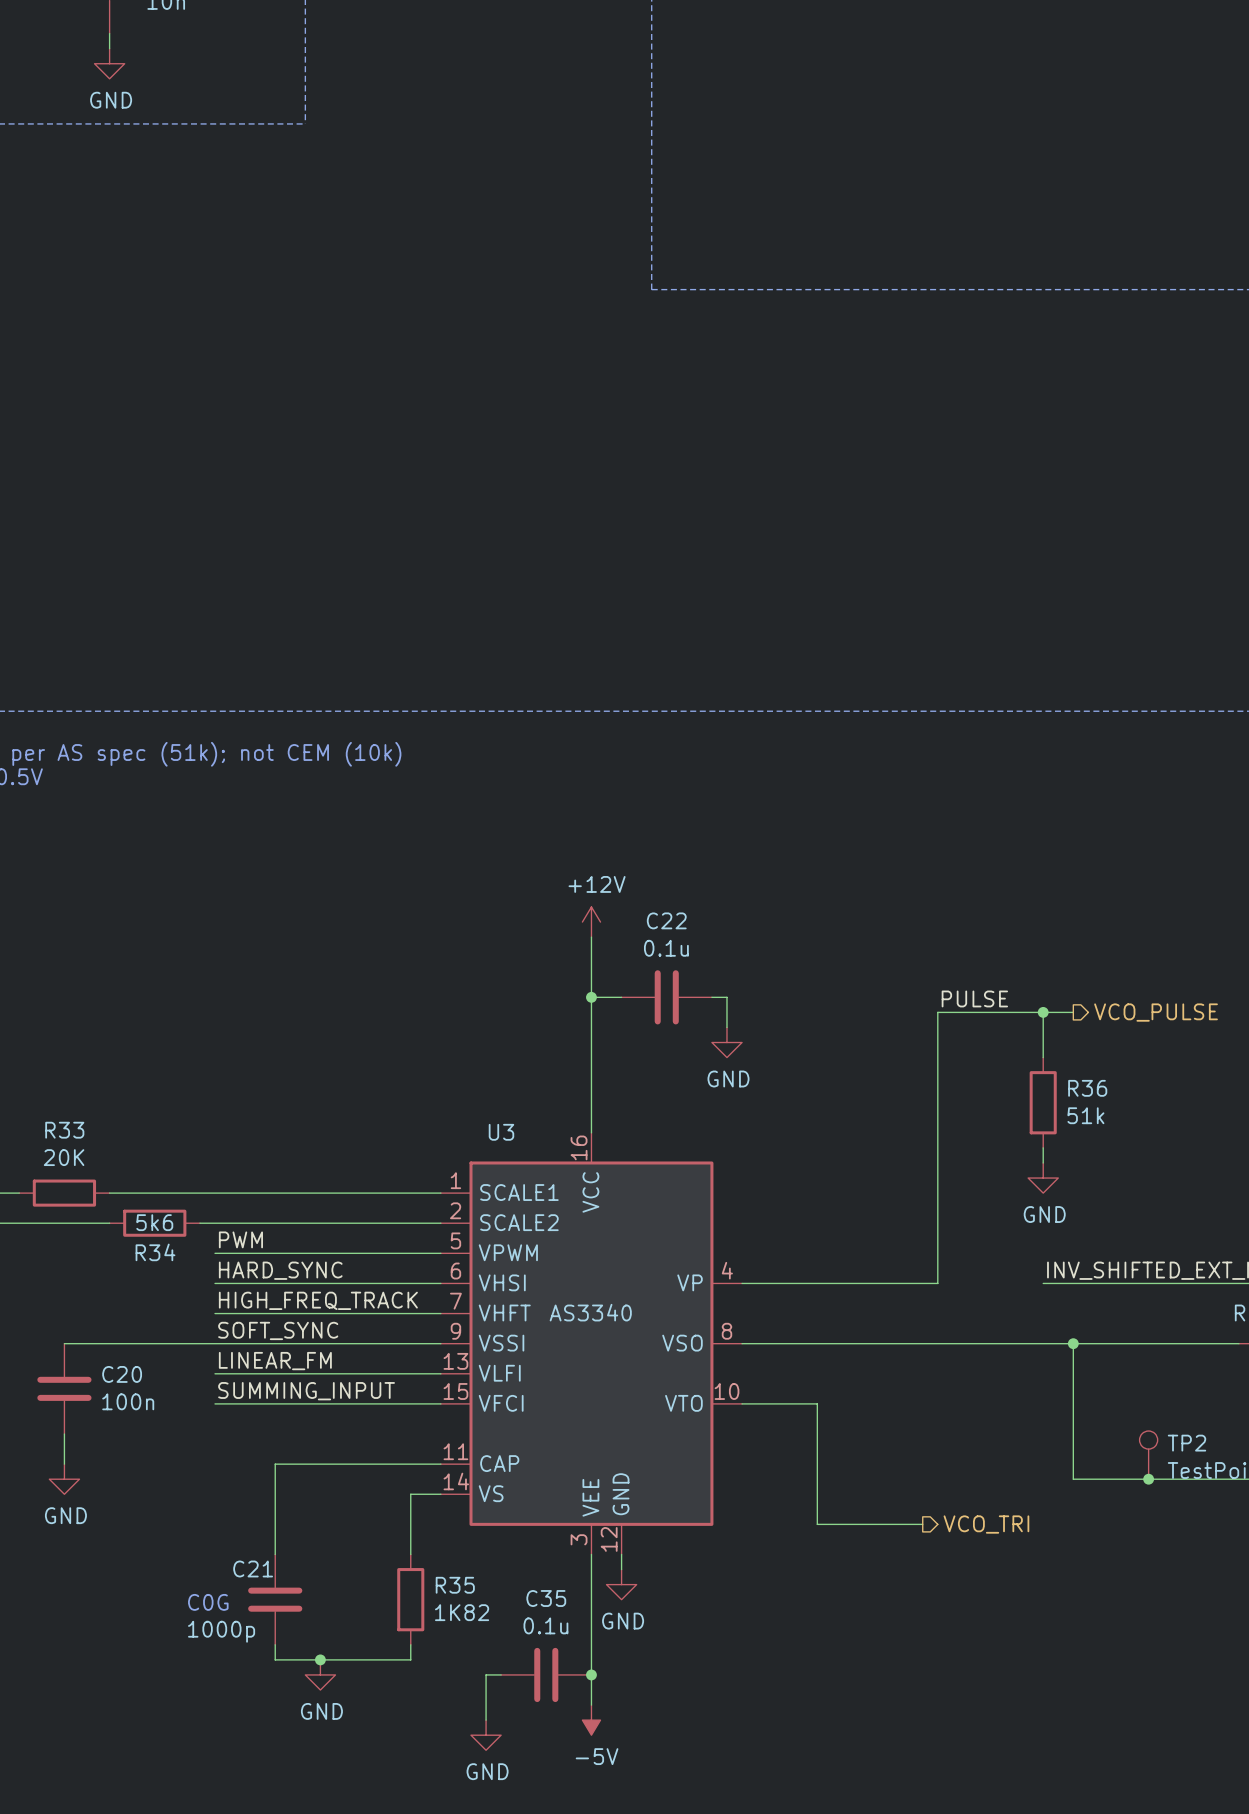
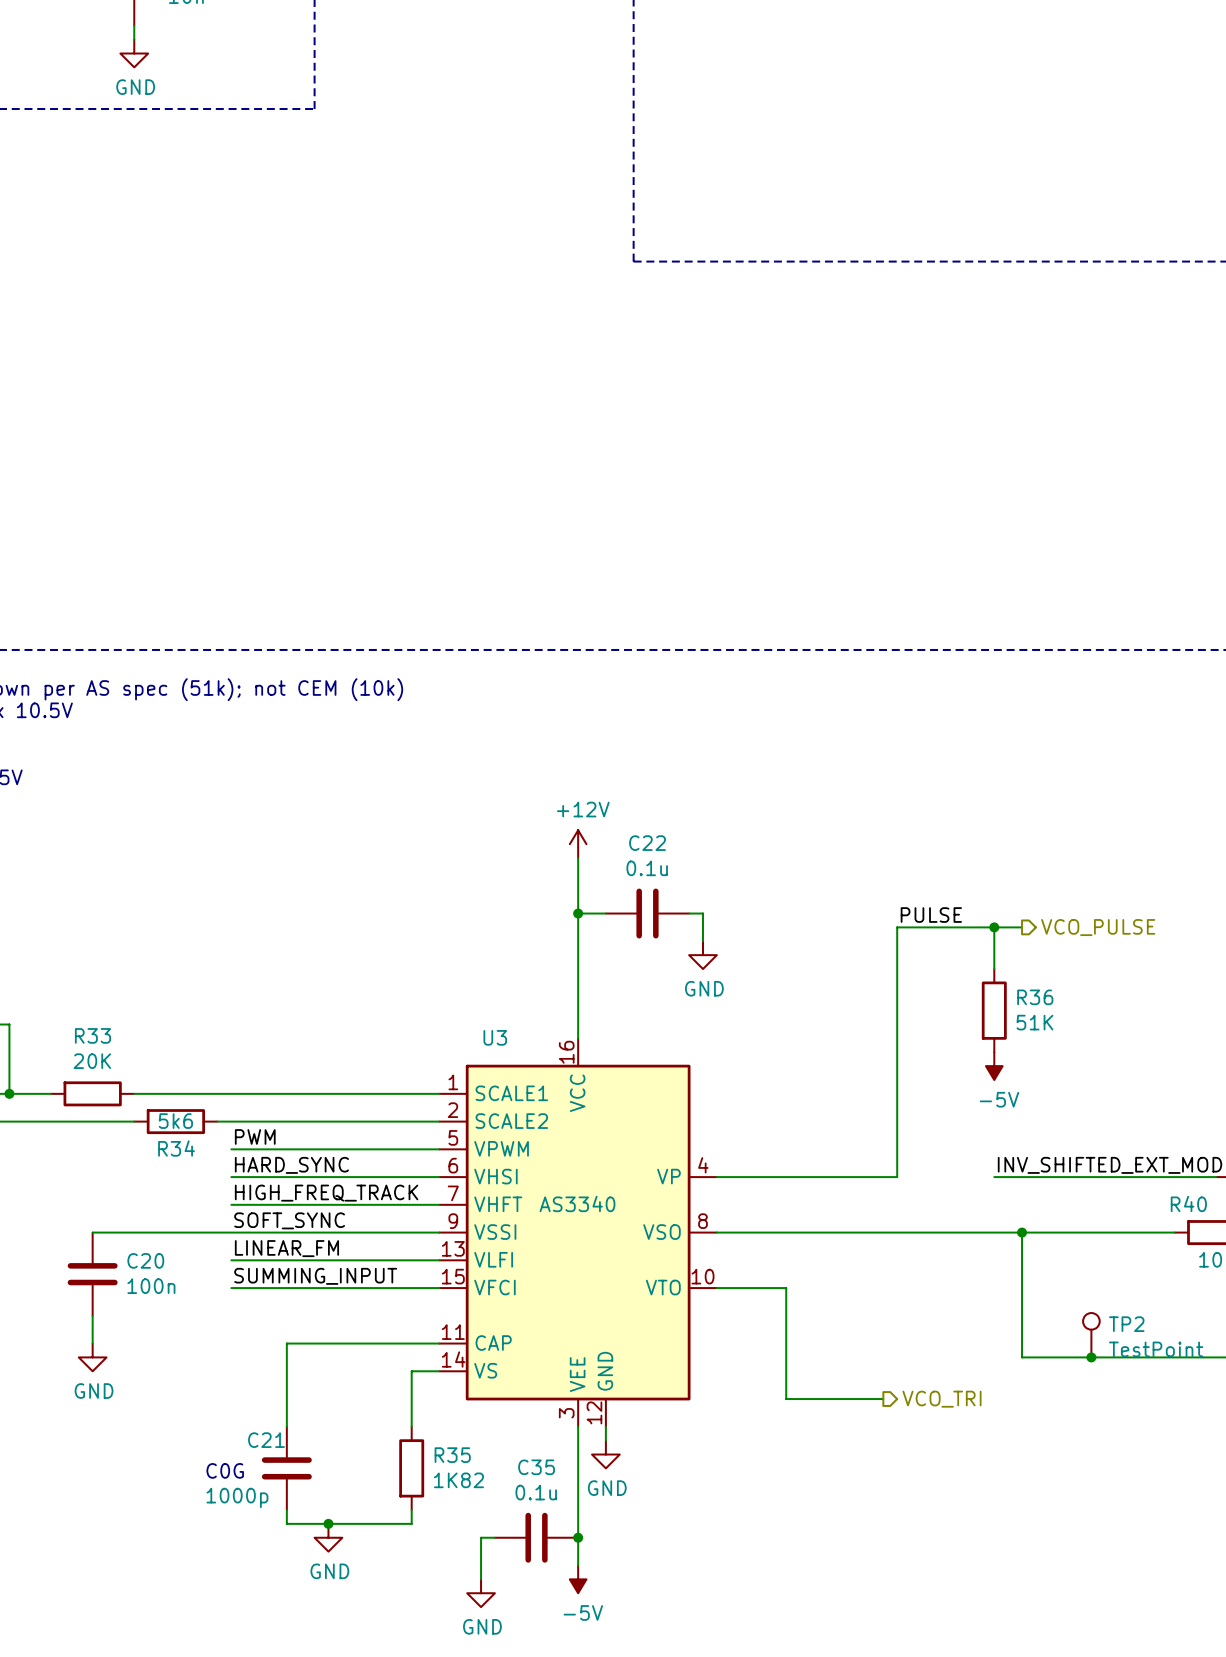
R36 value: 51k (1085, 1115) -> 51K (1034, 1022)
power symbol: none -> -5V (994, 1066)
power symbol: GND (1043, 1178) -> none

